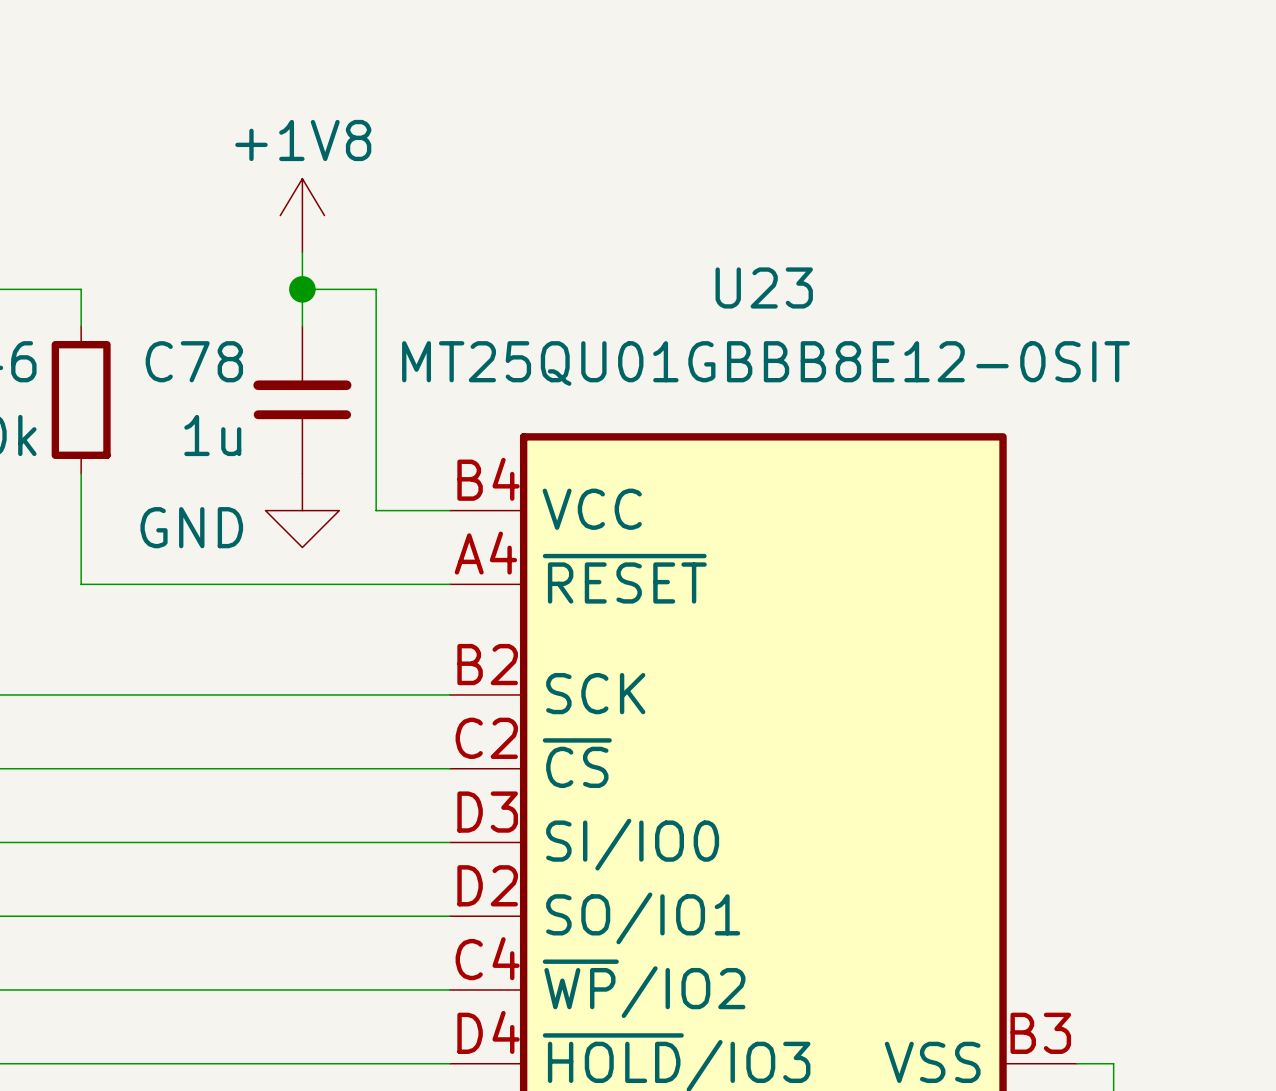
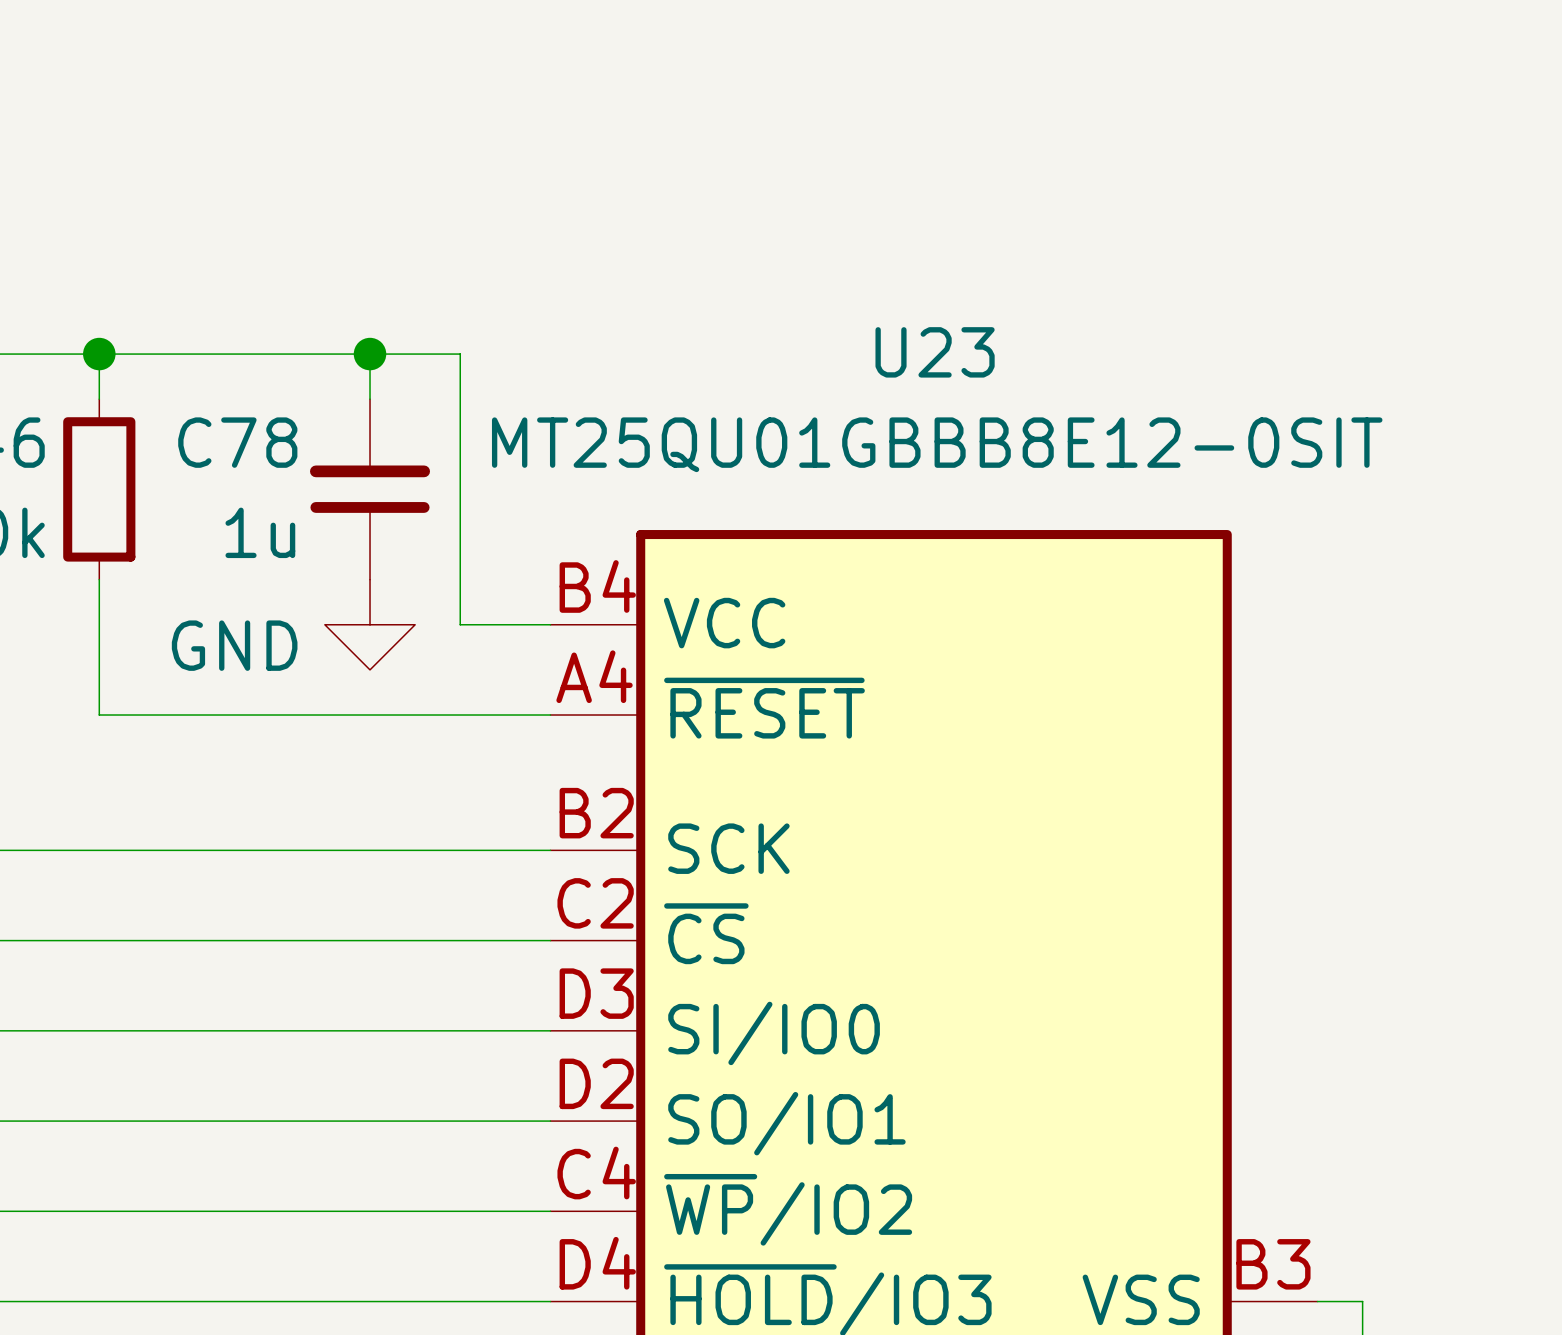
power symbol: +1V8 (302, 215) -> none
wire: (302, 252) (302, 289) -> (99, 354) (370, 354)
junction: none -> (99, 354)

